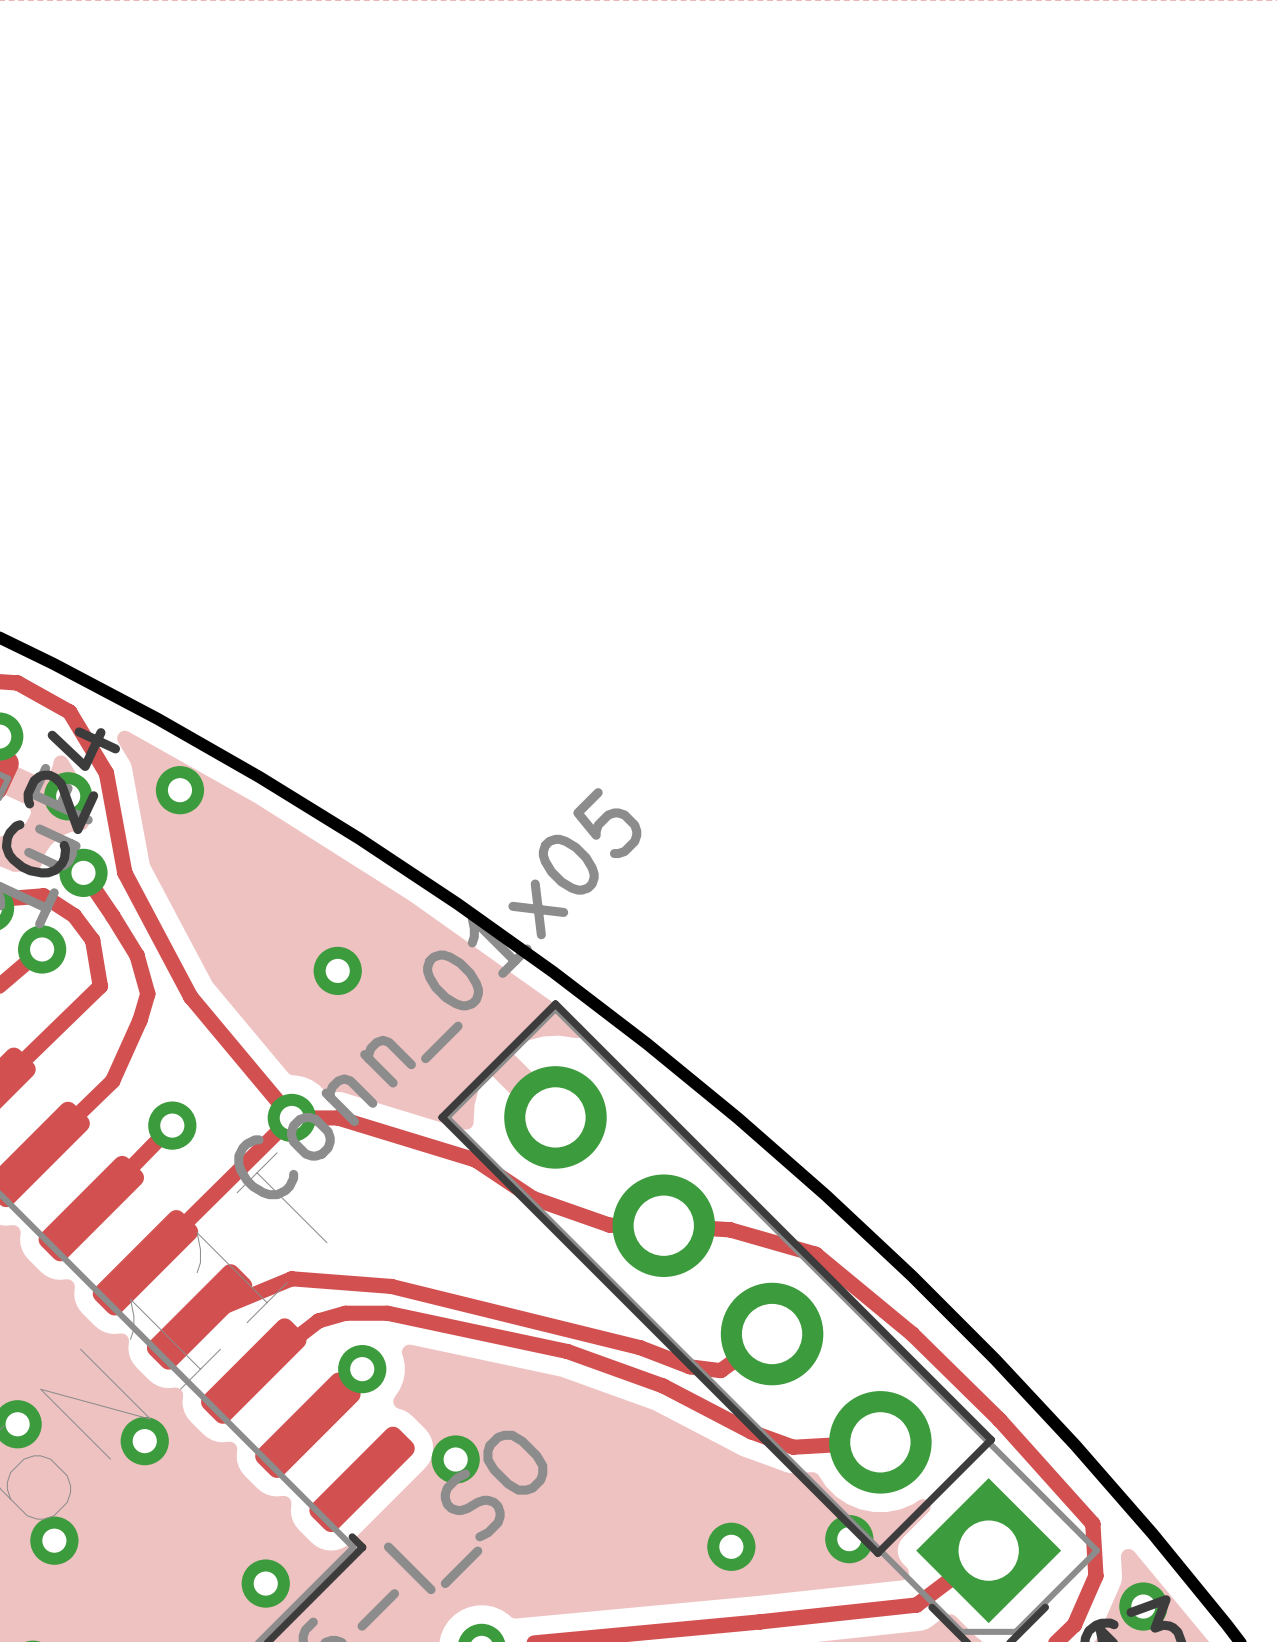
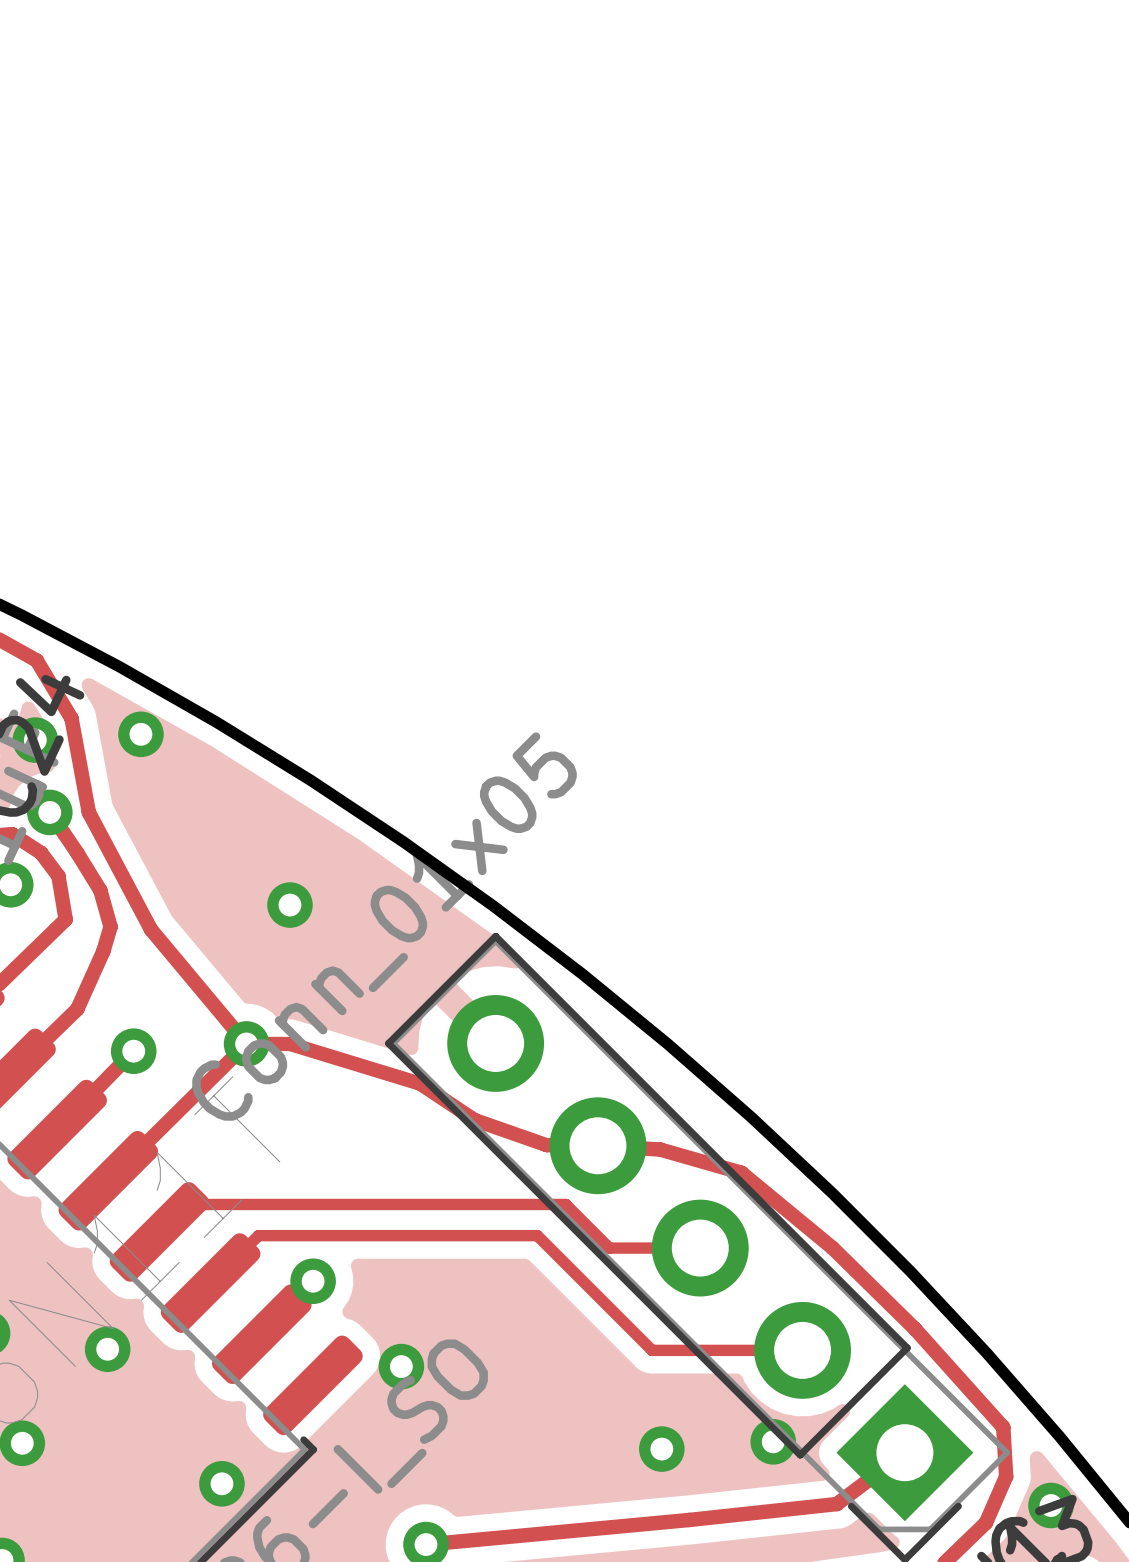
track: (199, 1316) (291, 1278) (391, 1286) (640, 1347) (690, 1366) (720, 1370) (772, 1334) -> (159, 1231) (187, 1204) (565, 1204) (609, 1248) (700, 1248)
track: (253, 1371) (318, 1320) (345, 1313) (387, 1313) (567, 1351) (663, 1385) (751, 1431) (793, 1447) (880, 1442) -> (211, 1283) (258, 1235) (537, 1235) (652, 1350) (802, 1350)

